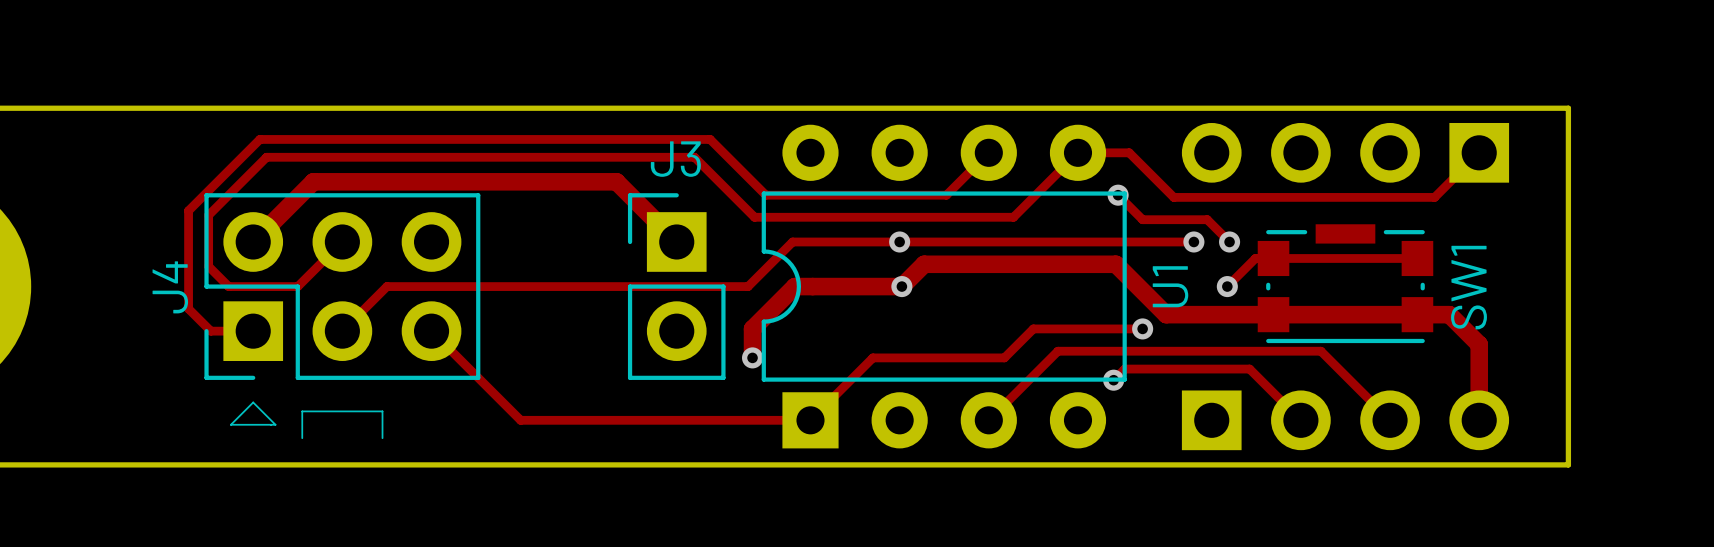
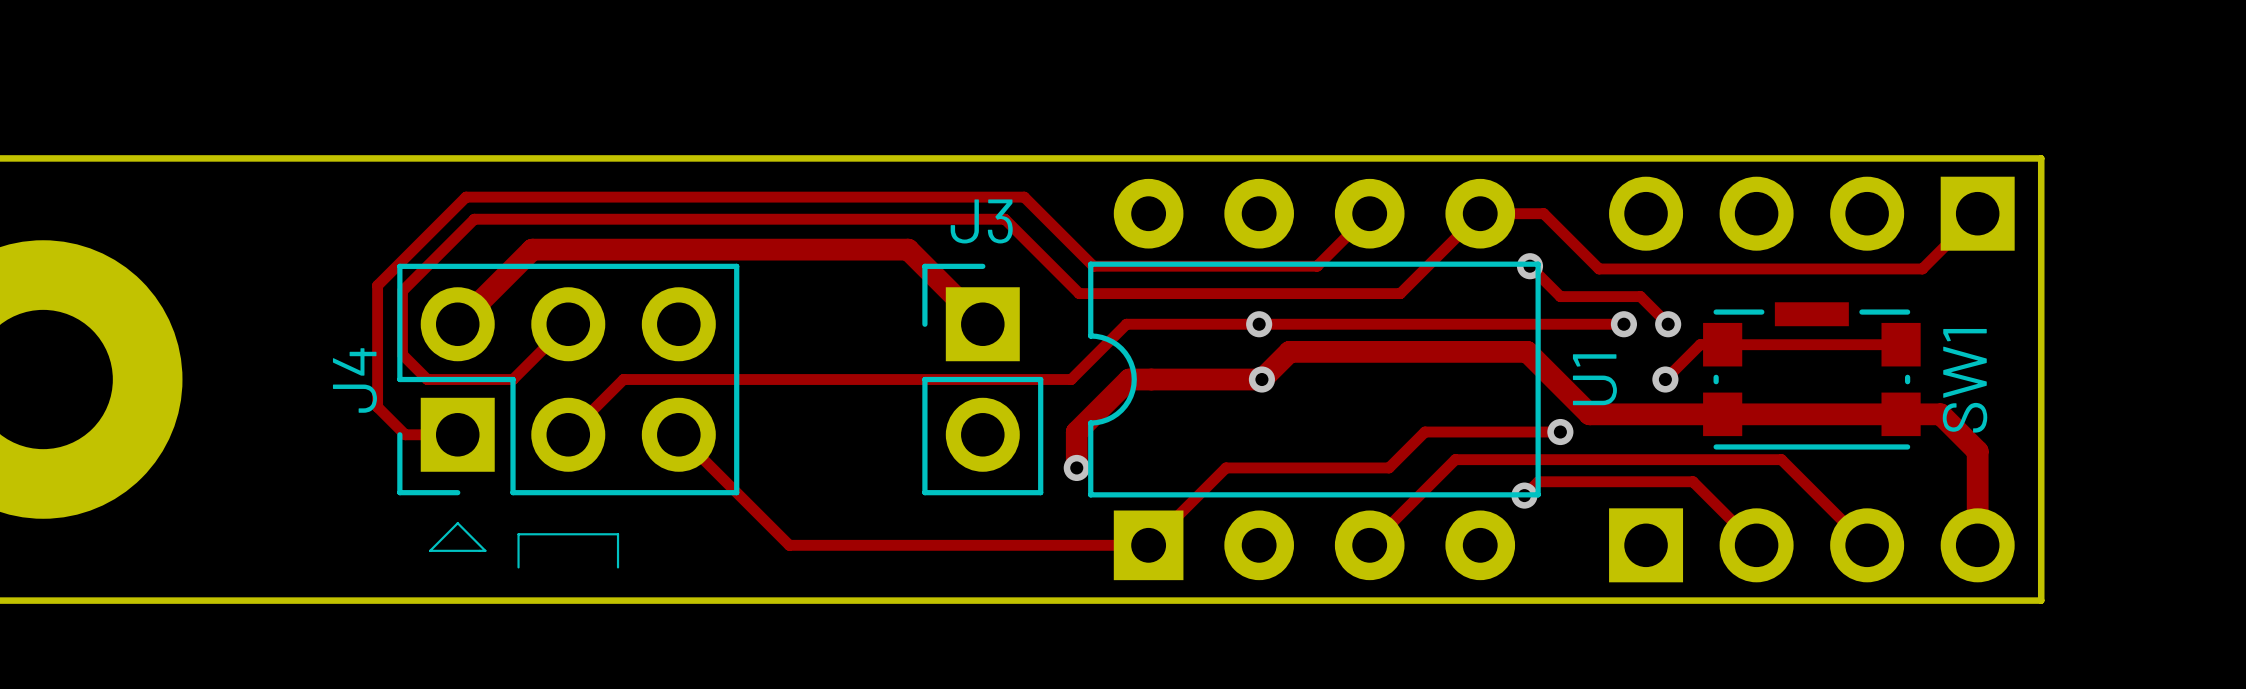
board edge: (1530, 108) (1568, 108) (1568, 464) (1530, 464) -> (2041, 158) (2041, 600)

